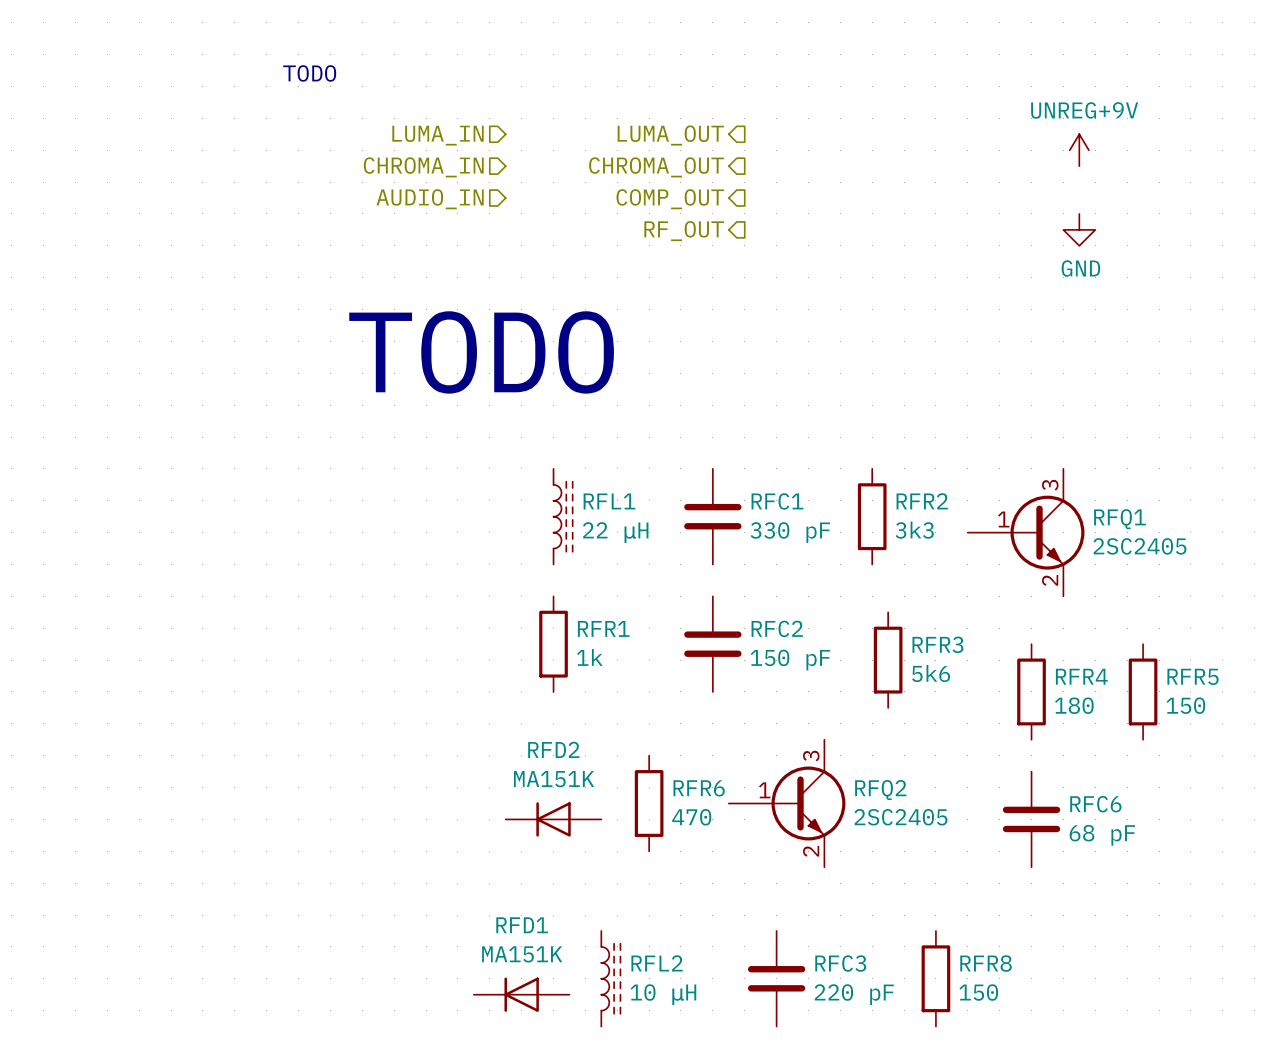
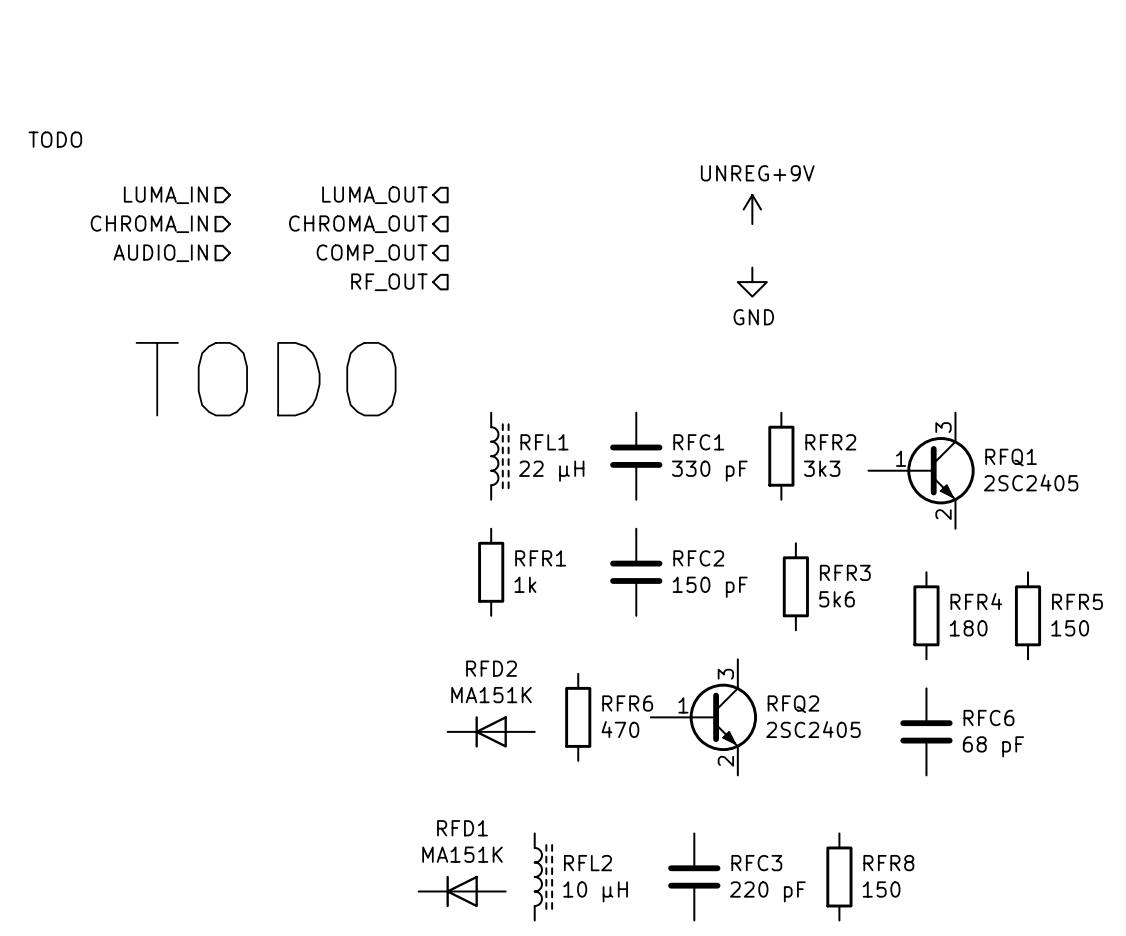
text: TODO (309, 73) -> none
hierarchical label position: LUMA_IN (438, 135) -> LUMA_IN (165, 195)
hierarchical label position: LUMA_OUT (670, 135) -> LUMA_OUT (374, 195)
power symbol position: UNREG+9V (1079, 150) -> UNREG+9V (752, 209)
hierarchical label position: CHROMA_IN (423, 167) -> CHROMA_IN (149, 224)
hierarchical label position: CHROMA_OUT (656, 167) -> CHROMA_OUT (358, 224)
text: none -> TODO (55, 139)
hierarchical label position: AUDIO_IN (430, 199) -> AUDIO_IN (160, 253)
hierarchical label position: COMP_OUT (670, 199) -> COMP_OUT (372, 253)
power symbol position: GND (1079, 229) -> GND (752, 282)
hierarchical label position: RF_OUT (684, 231) -> RF_OUT (389, 282)
text position: TODO (481, 352) -> TODO (266, 379)

